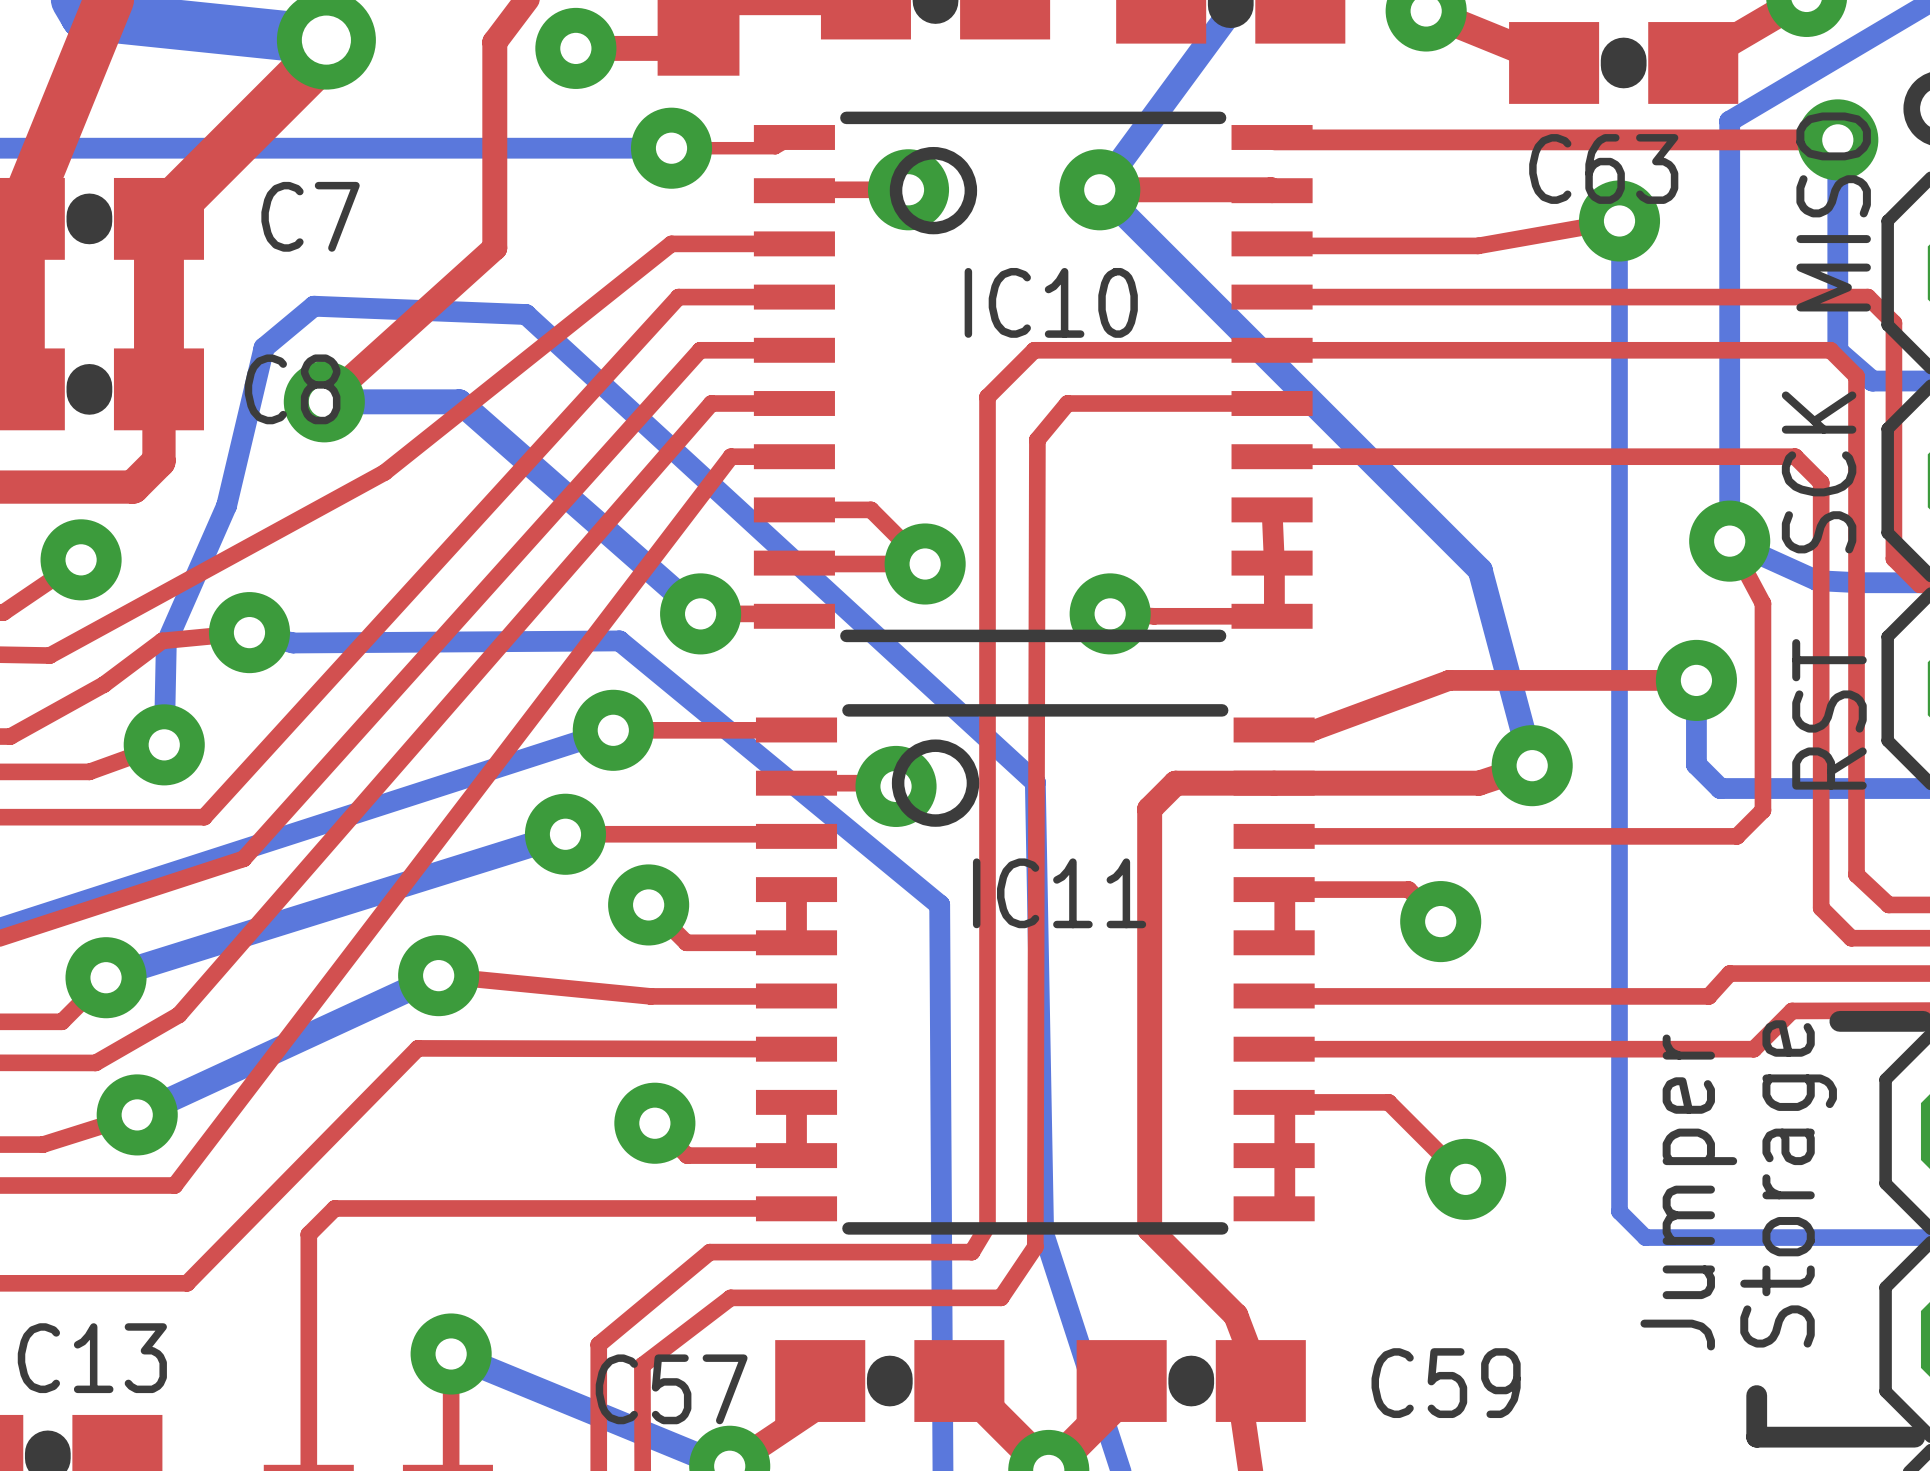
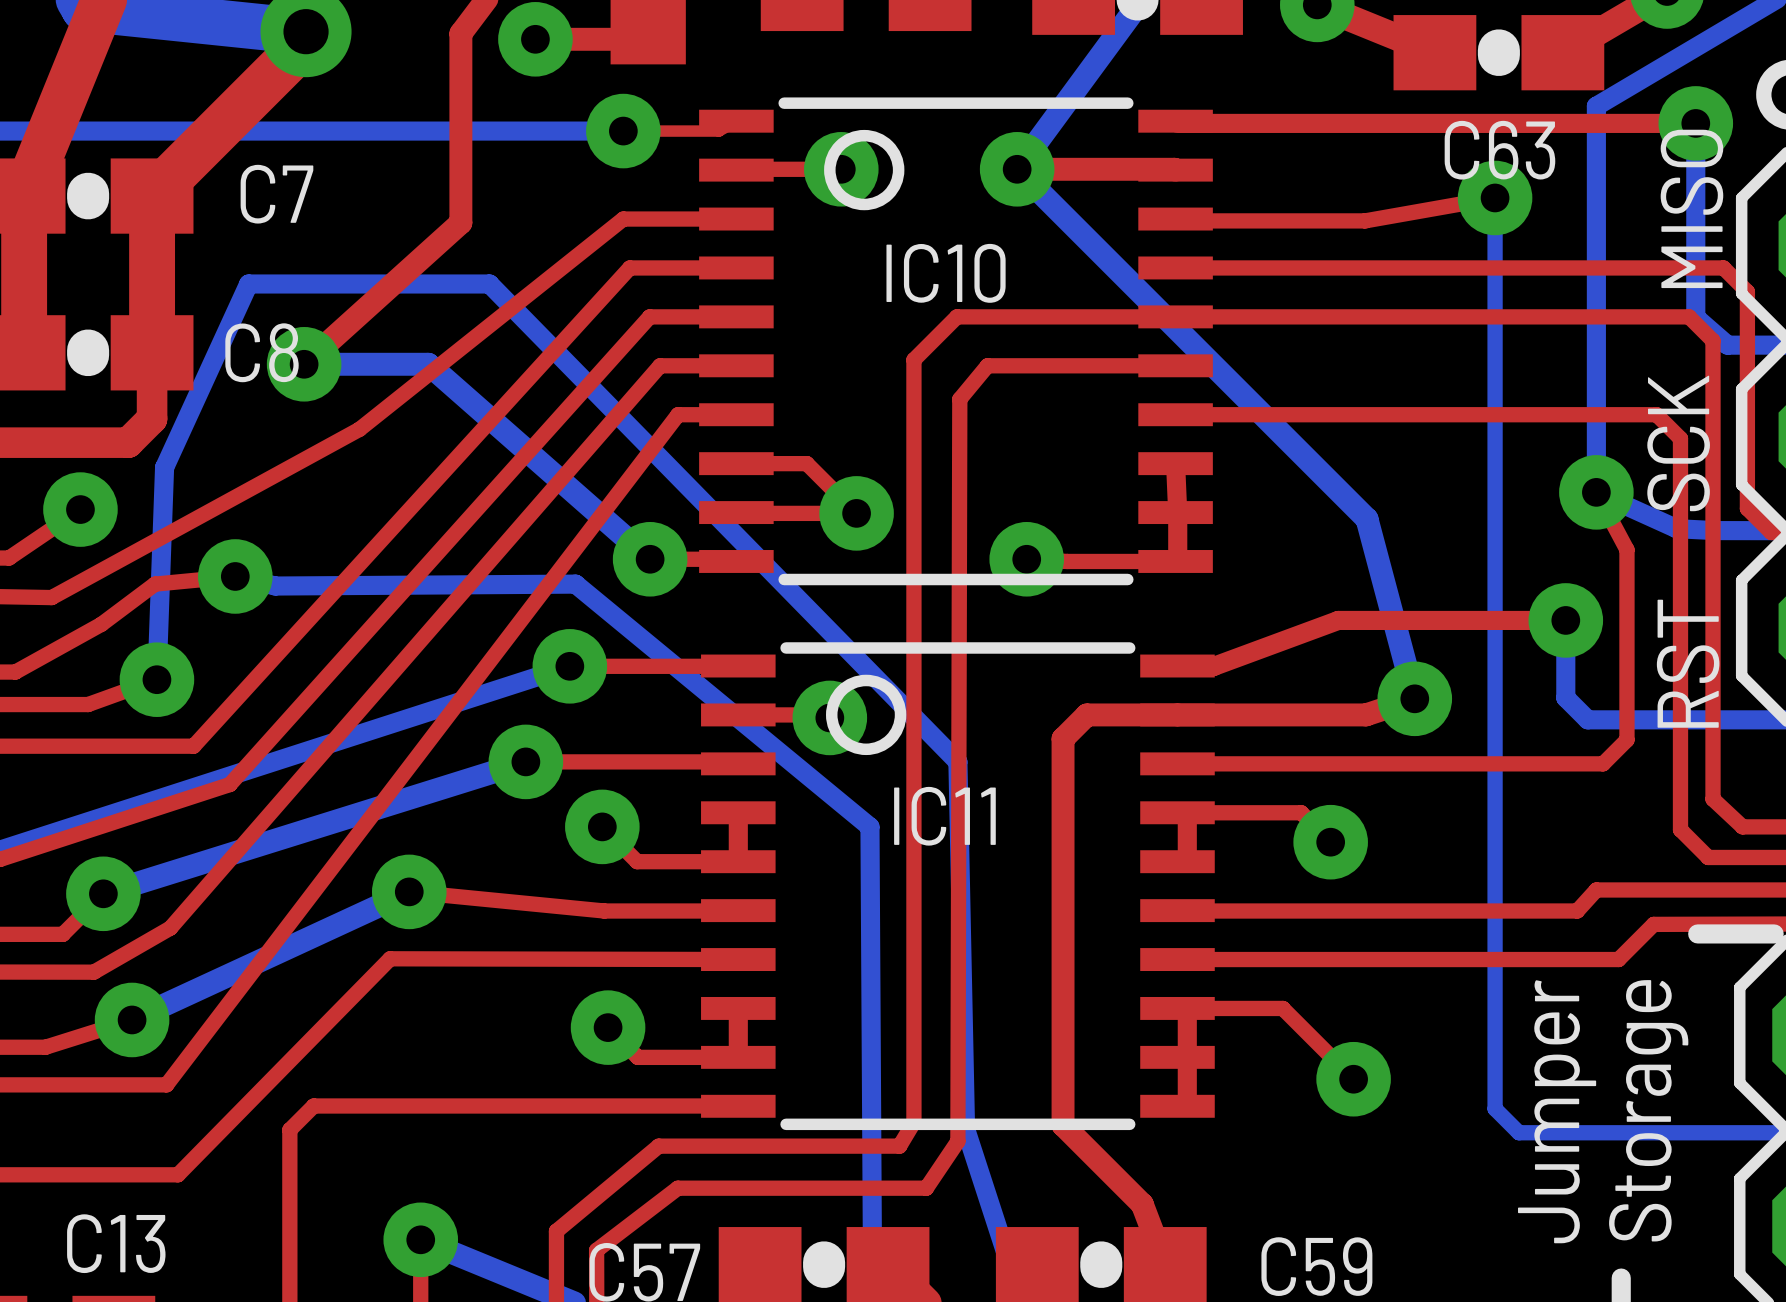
bottom track: (164, 744) (166, 643) (226, 505) (264, 347) (313, 306) (525, 314) (1035, 782) (1043, 1233) -> (156, 679) (164, 467) (248, 283) (489, 283) (957, 761) (965, 1128)

